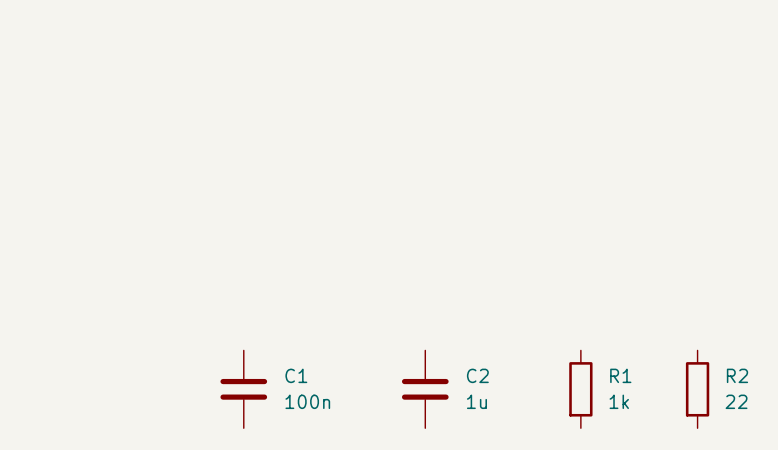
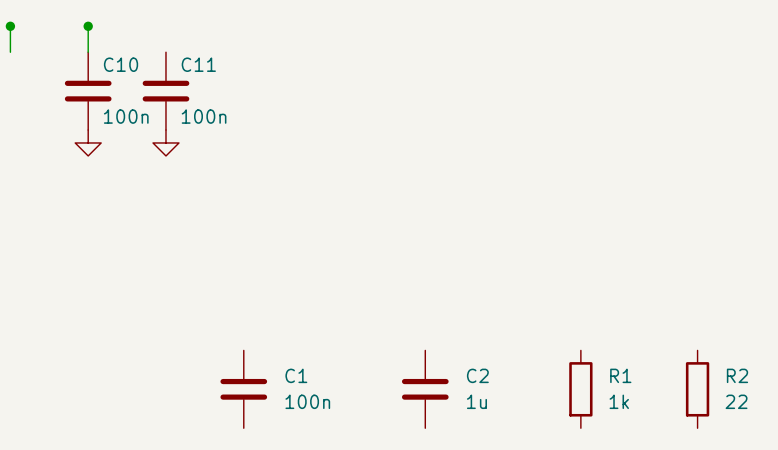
wire: none -> (10, 26) (10, 52)
junction: none -> (10, 26)
wire: none -> (88, 26) (88, 52)
junction: none -> (88, 26)
C10: none -> 100n (88, 91)
C11: none -> 100n (165, 91)
power symbol: none -> (88, 142)
power symbol: none -> (165, 142)

